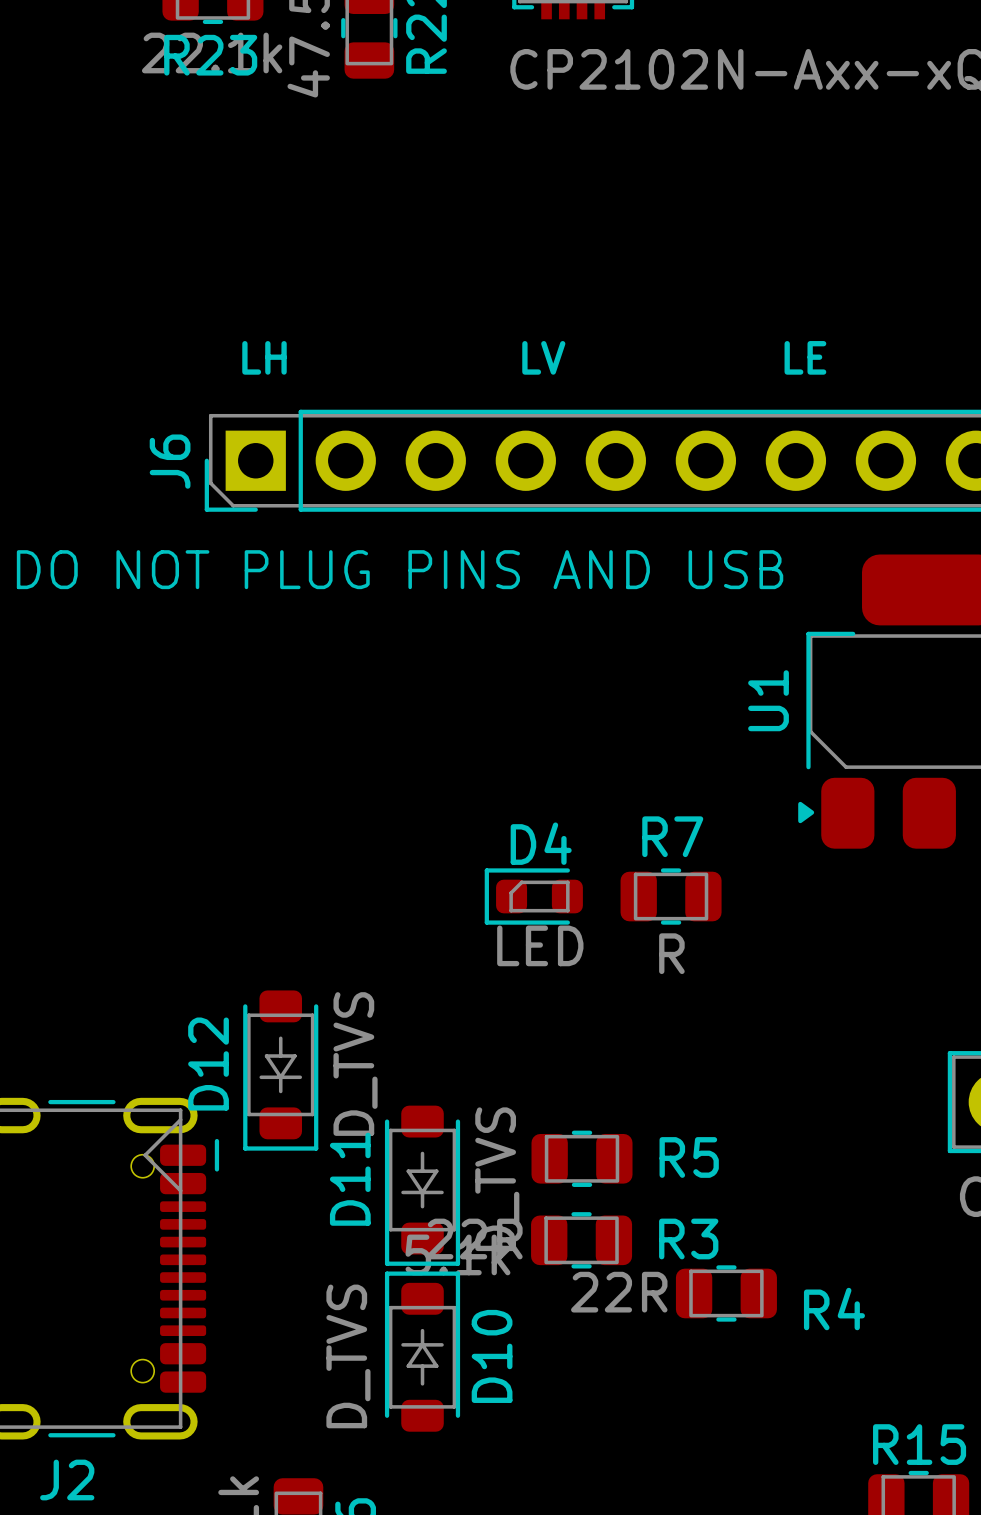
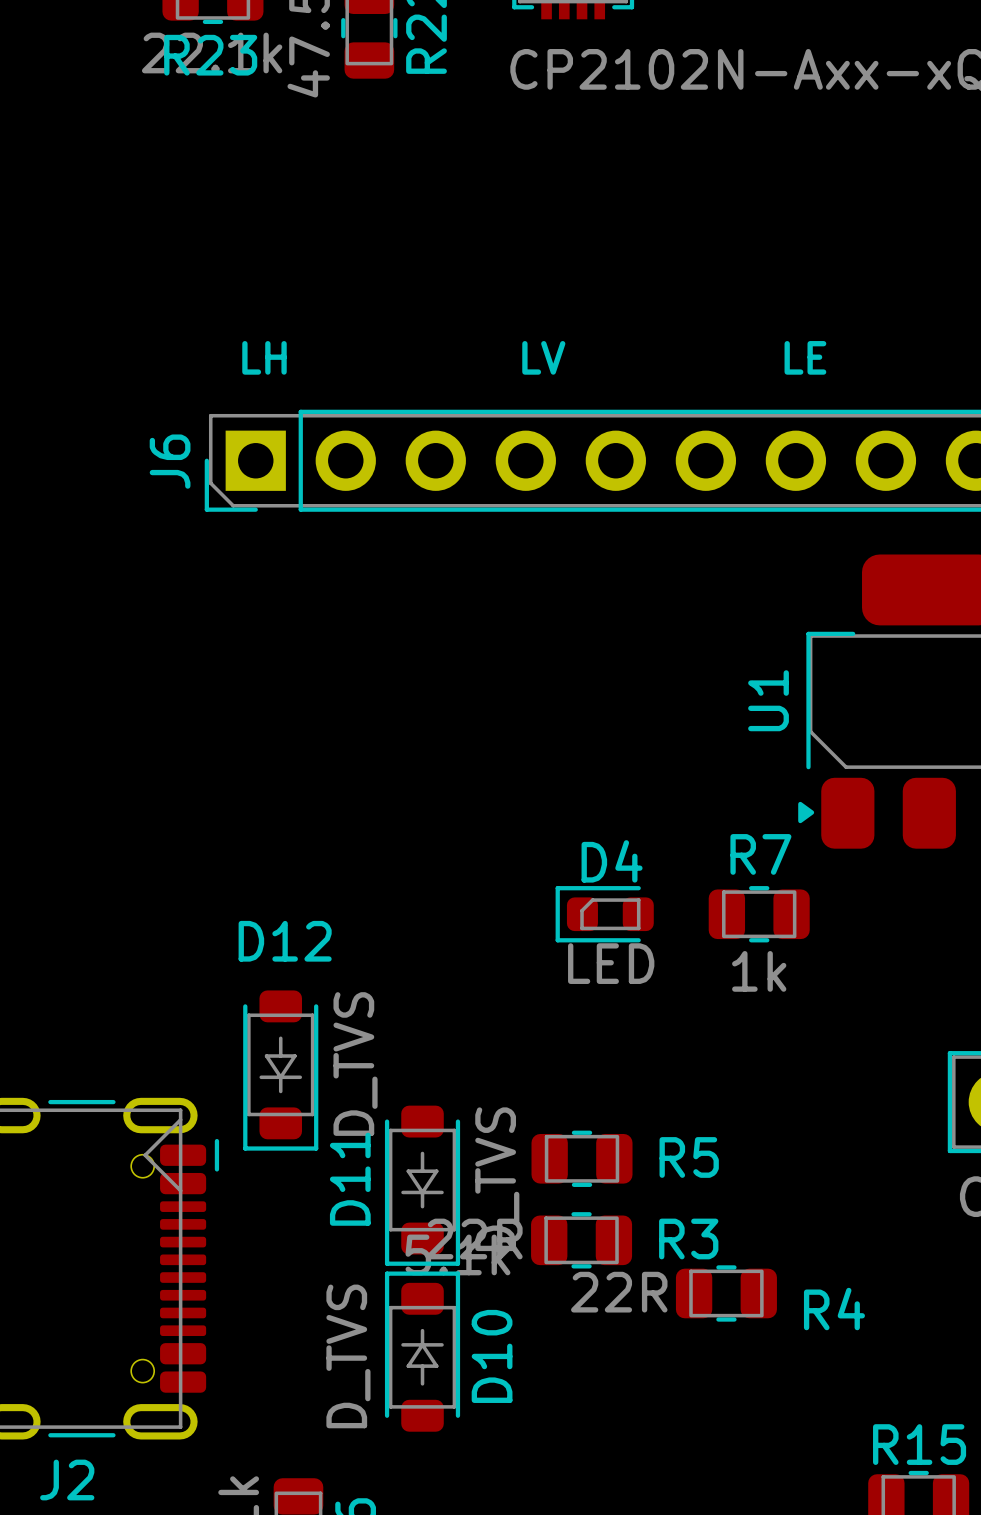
text: DO NOT PLUG PINS AND USB (400, 569) -> none
D4 position: (533, 896) -> (604, 914)
R7 position: (671, 896) -> (759, 914)
R7 value: R (671, 953) -> 1k (759, 971)
D12 name rotation: 0° (208, 1064) -> 90° clockwise (285, 941)
D12 name position: D12 (208, 1064) -> D12 (285, 941)

